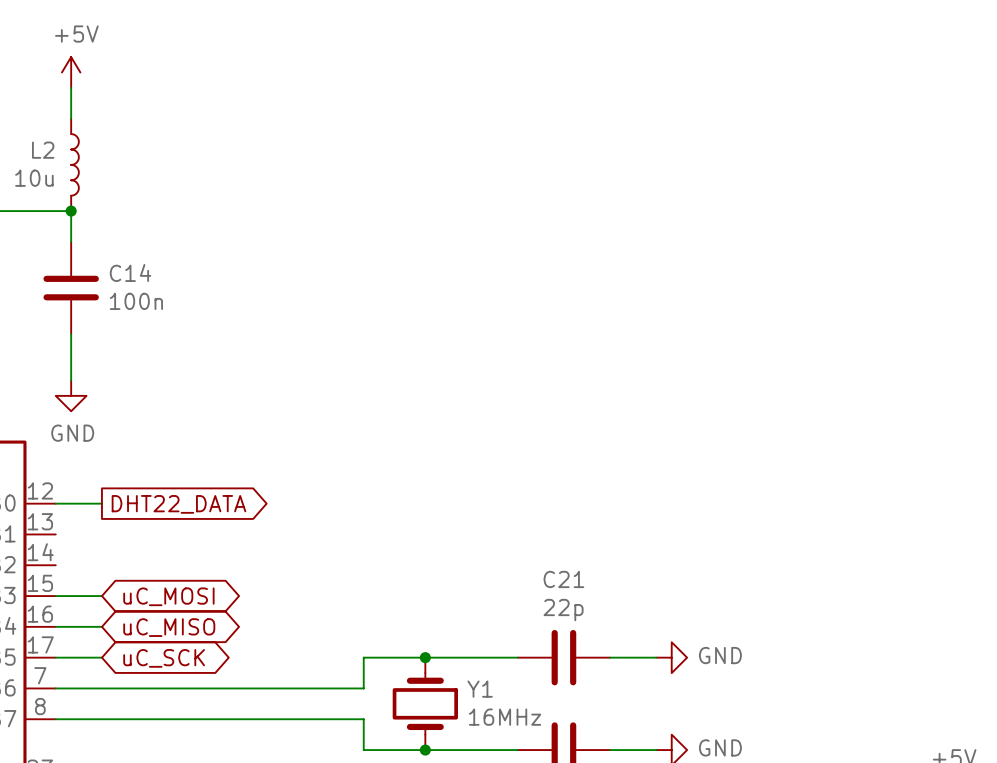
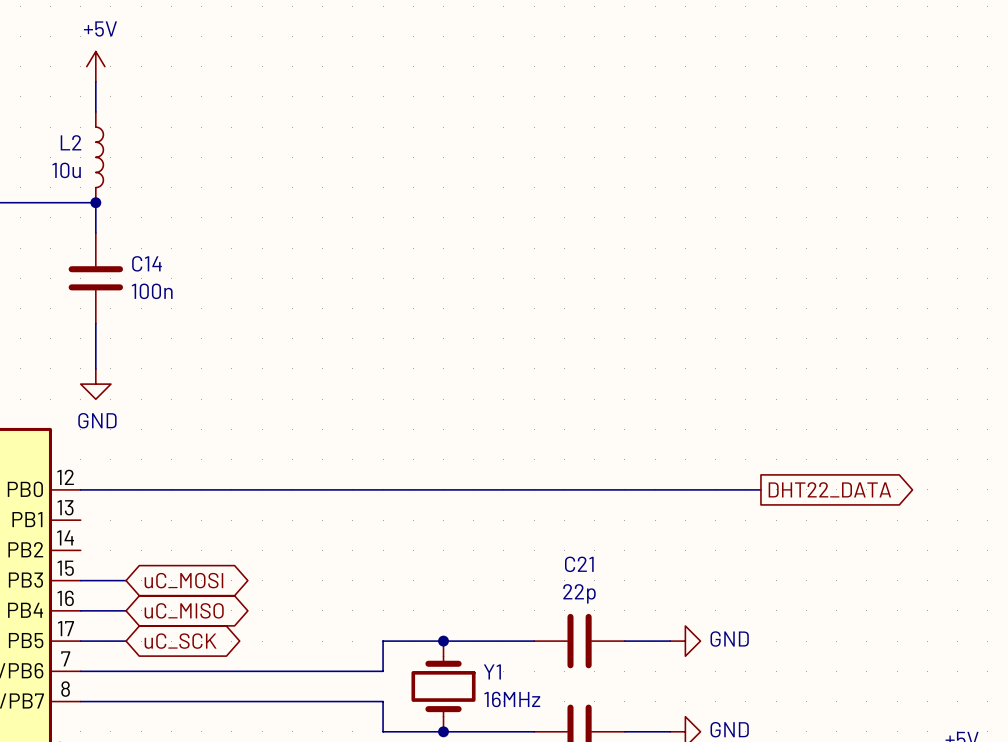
wire: none -> (126, 489) (760, 489)
global label: DHT22_DATA (178, 504) -> none
global label: none -> DHT22_DATA (829, 489)

